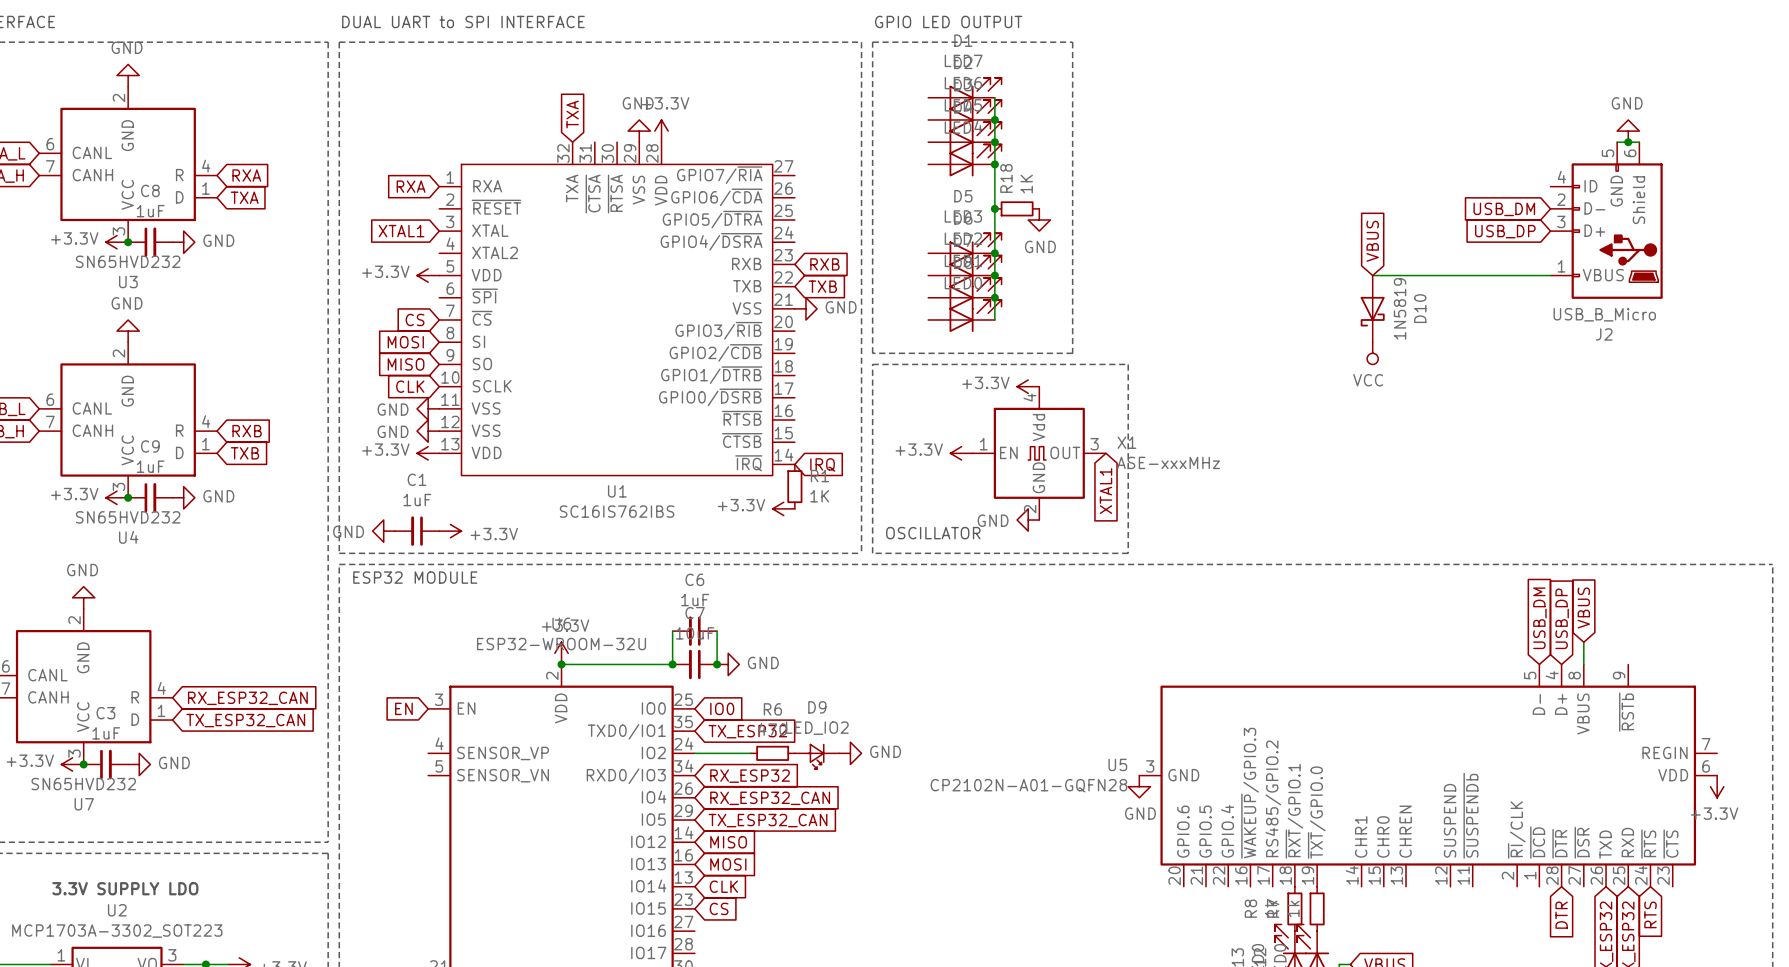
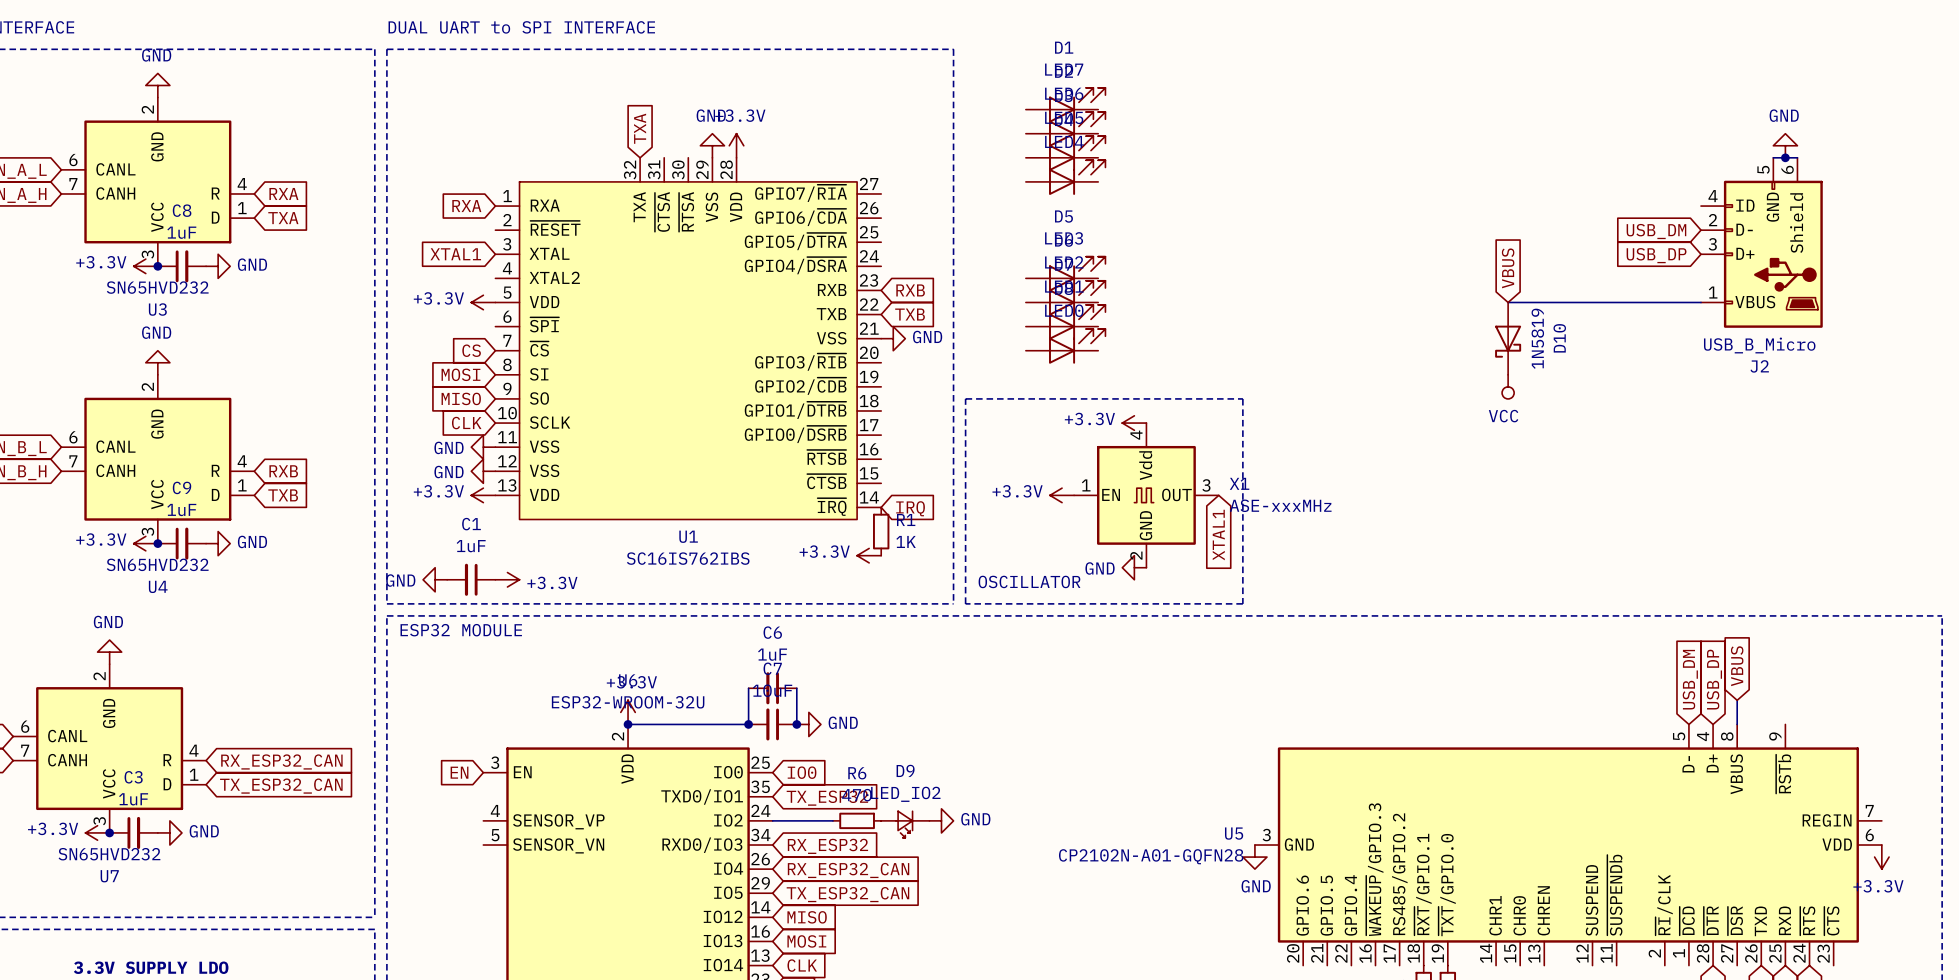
text: GPIO LED OUTPUT (948, 21) -> none
line: (872, 42) (1072, 42) (1072, 353) (872, 353) (872, 42) -> none
wire: (994, 97) (994, 319) -> none
junction: (994, 119) -> none
junction: (994, 142) -> none
junction: (994, 164) -> none
junction: (994, 208) -> none
R18: 1K (1017, 208) -> none
power symbol: GND (1039, 219) -> none
junction: (994, 253) -> none
junction: (994, 275) -> none
junction: (994, 297) -> none

